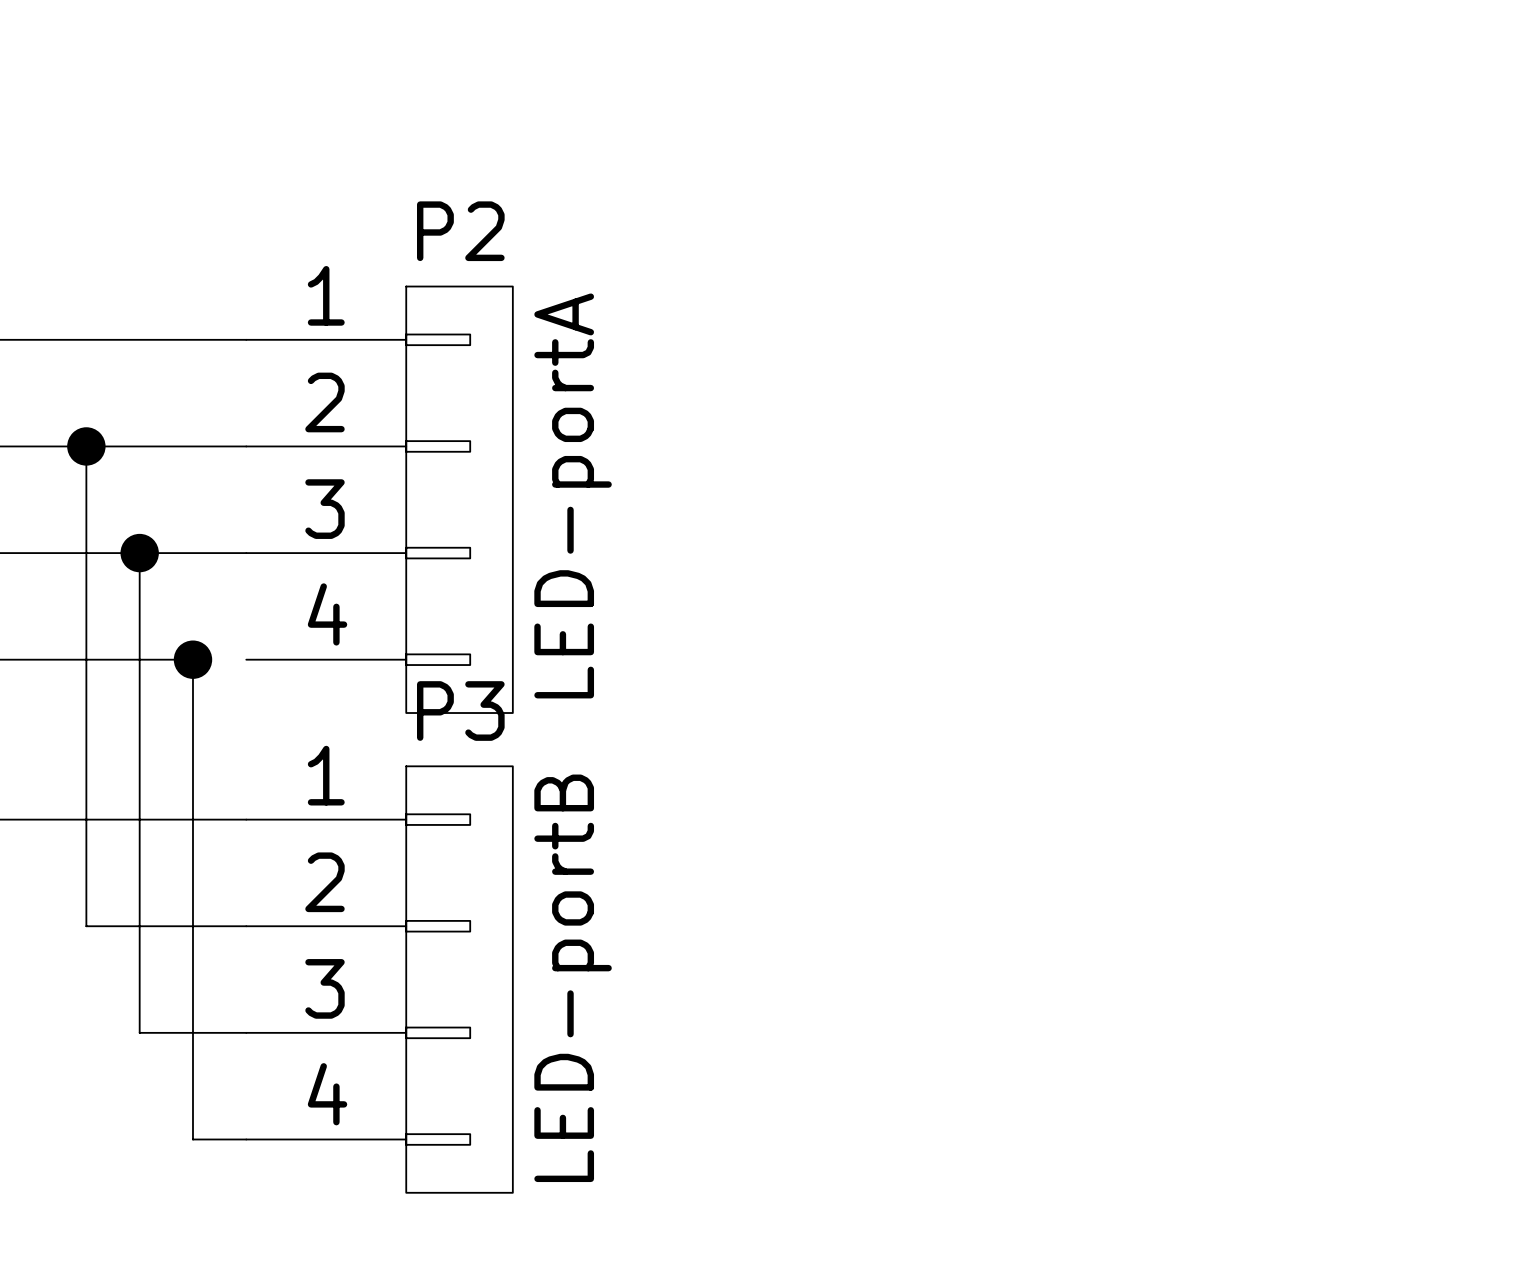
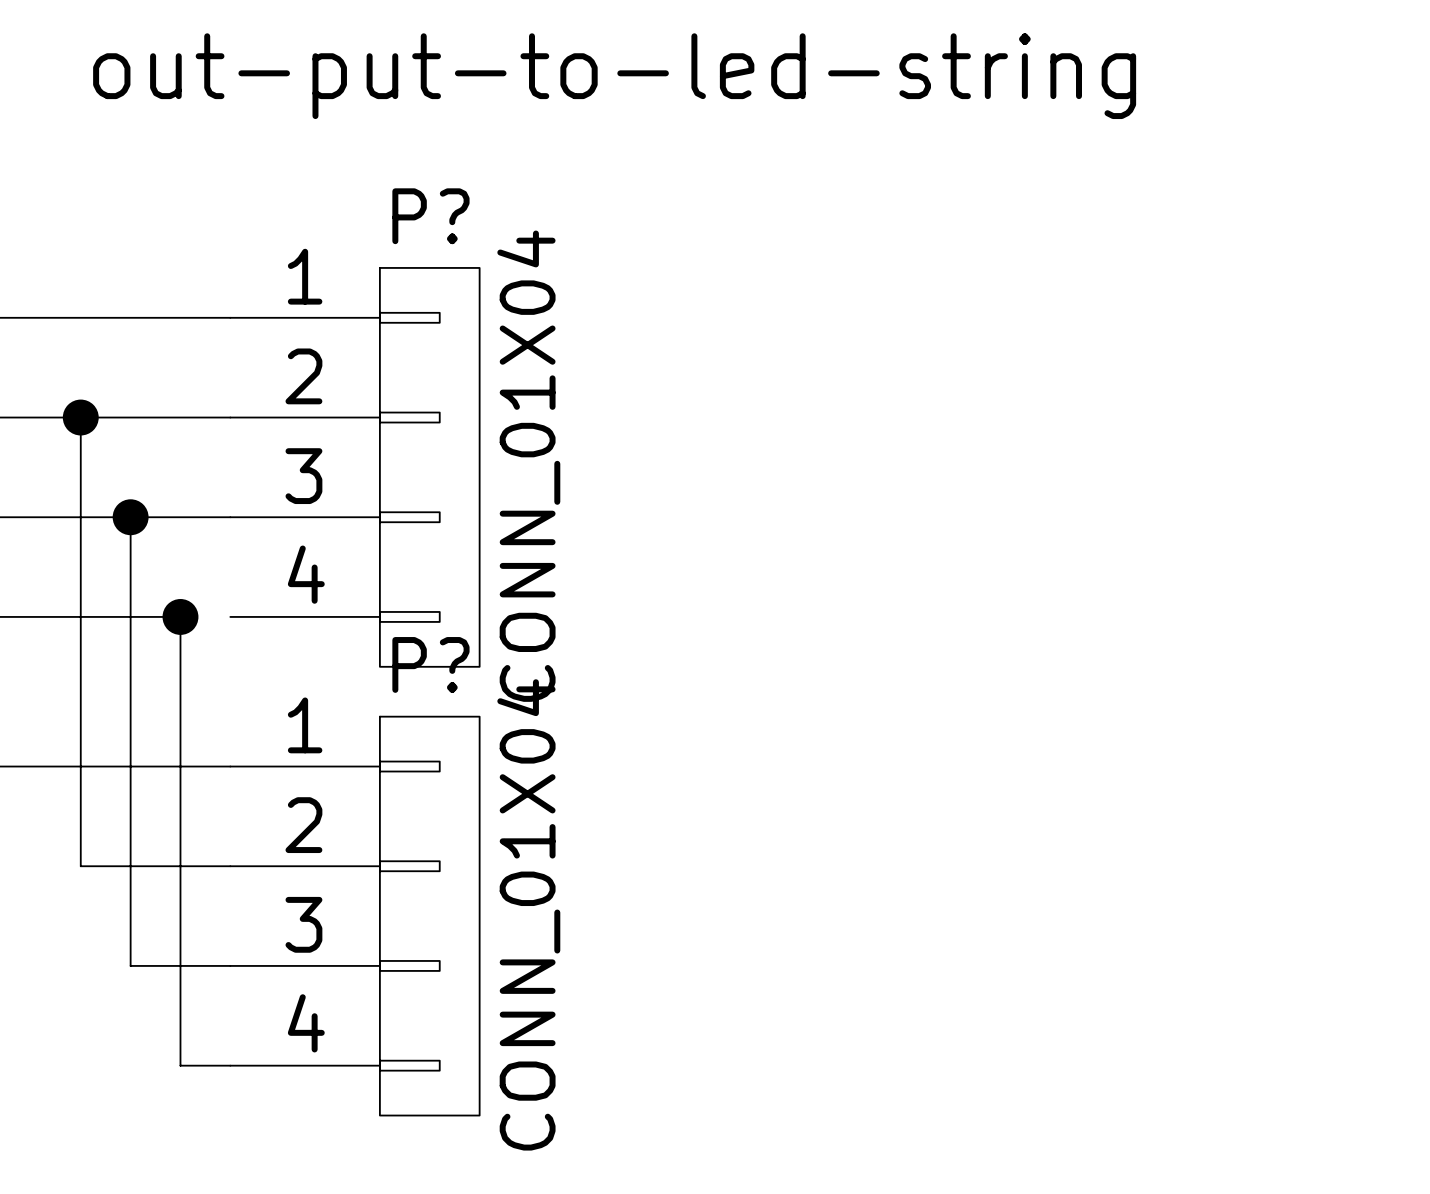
label: none -> out-put-to-led-string (614, 76)
P2 name: P2 (460, 231) -> P? (430, 216)
P2 value: LED-portA (573, 495) -> CONN_01X04 (528, 466)
P3 name: P3 (460, 711) -> P? (430, 664)
P3 value: LED-portB (573, 978) -> CONN_01X04 (528, 914)

